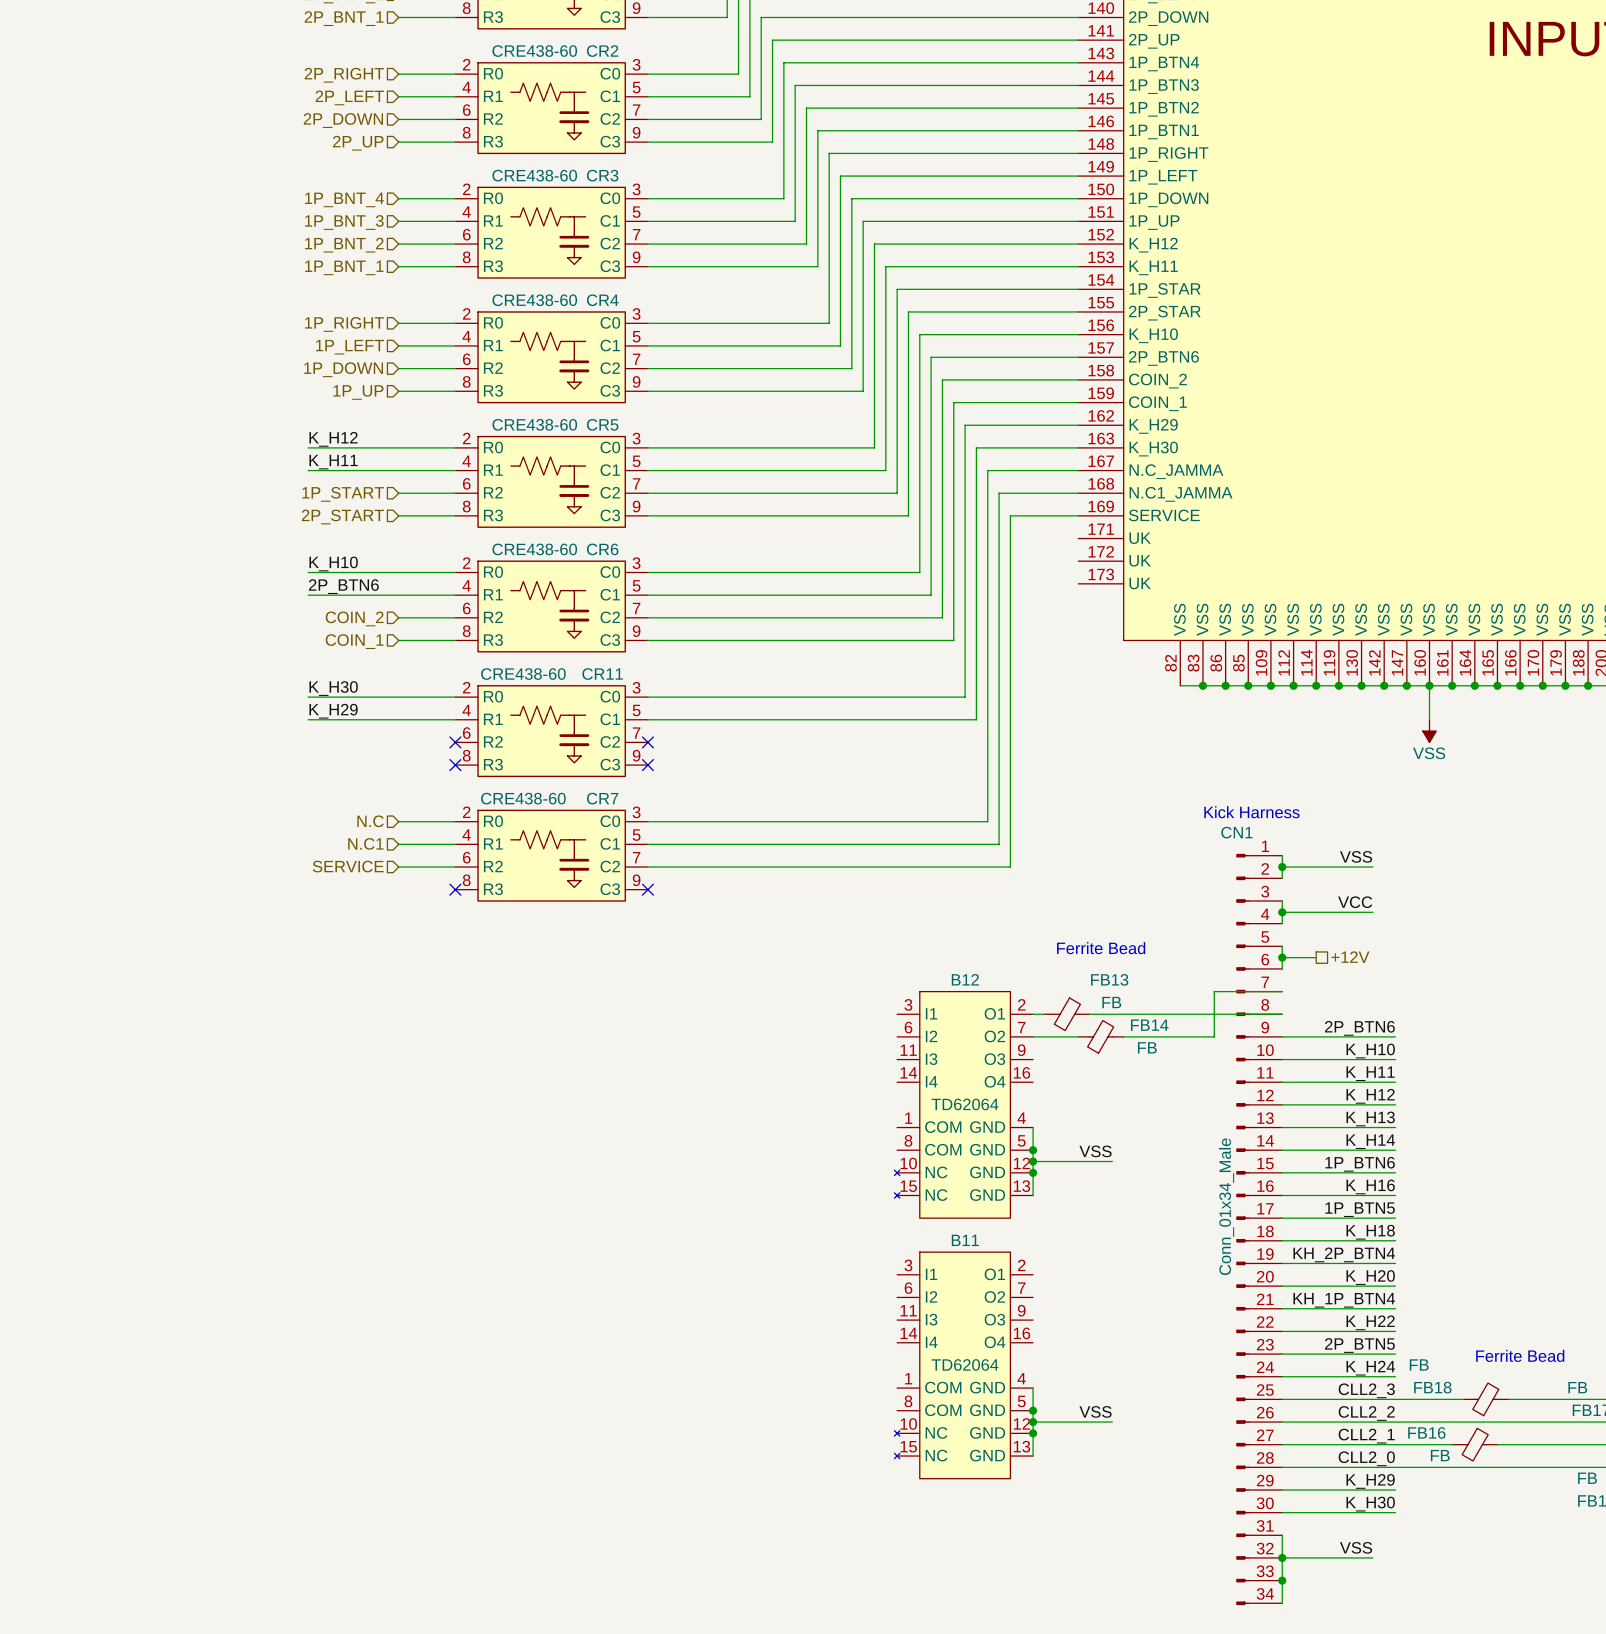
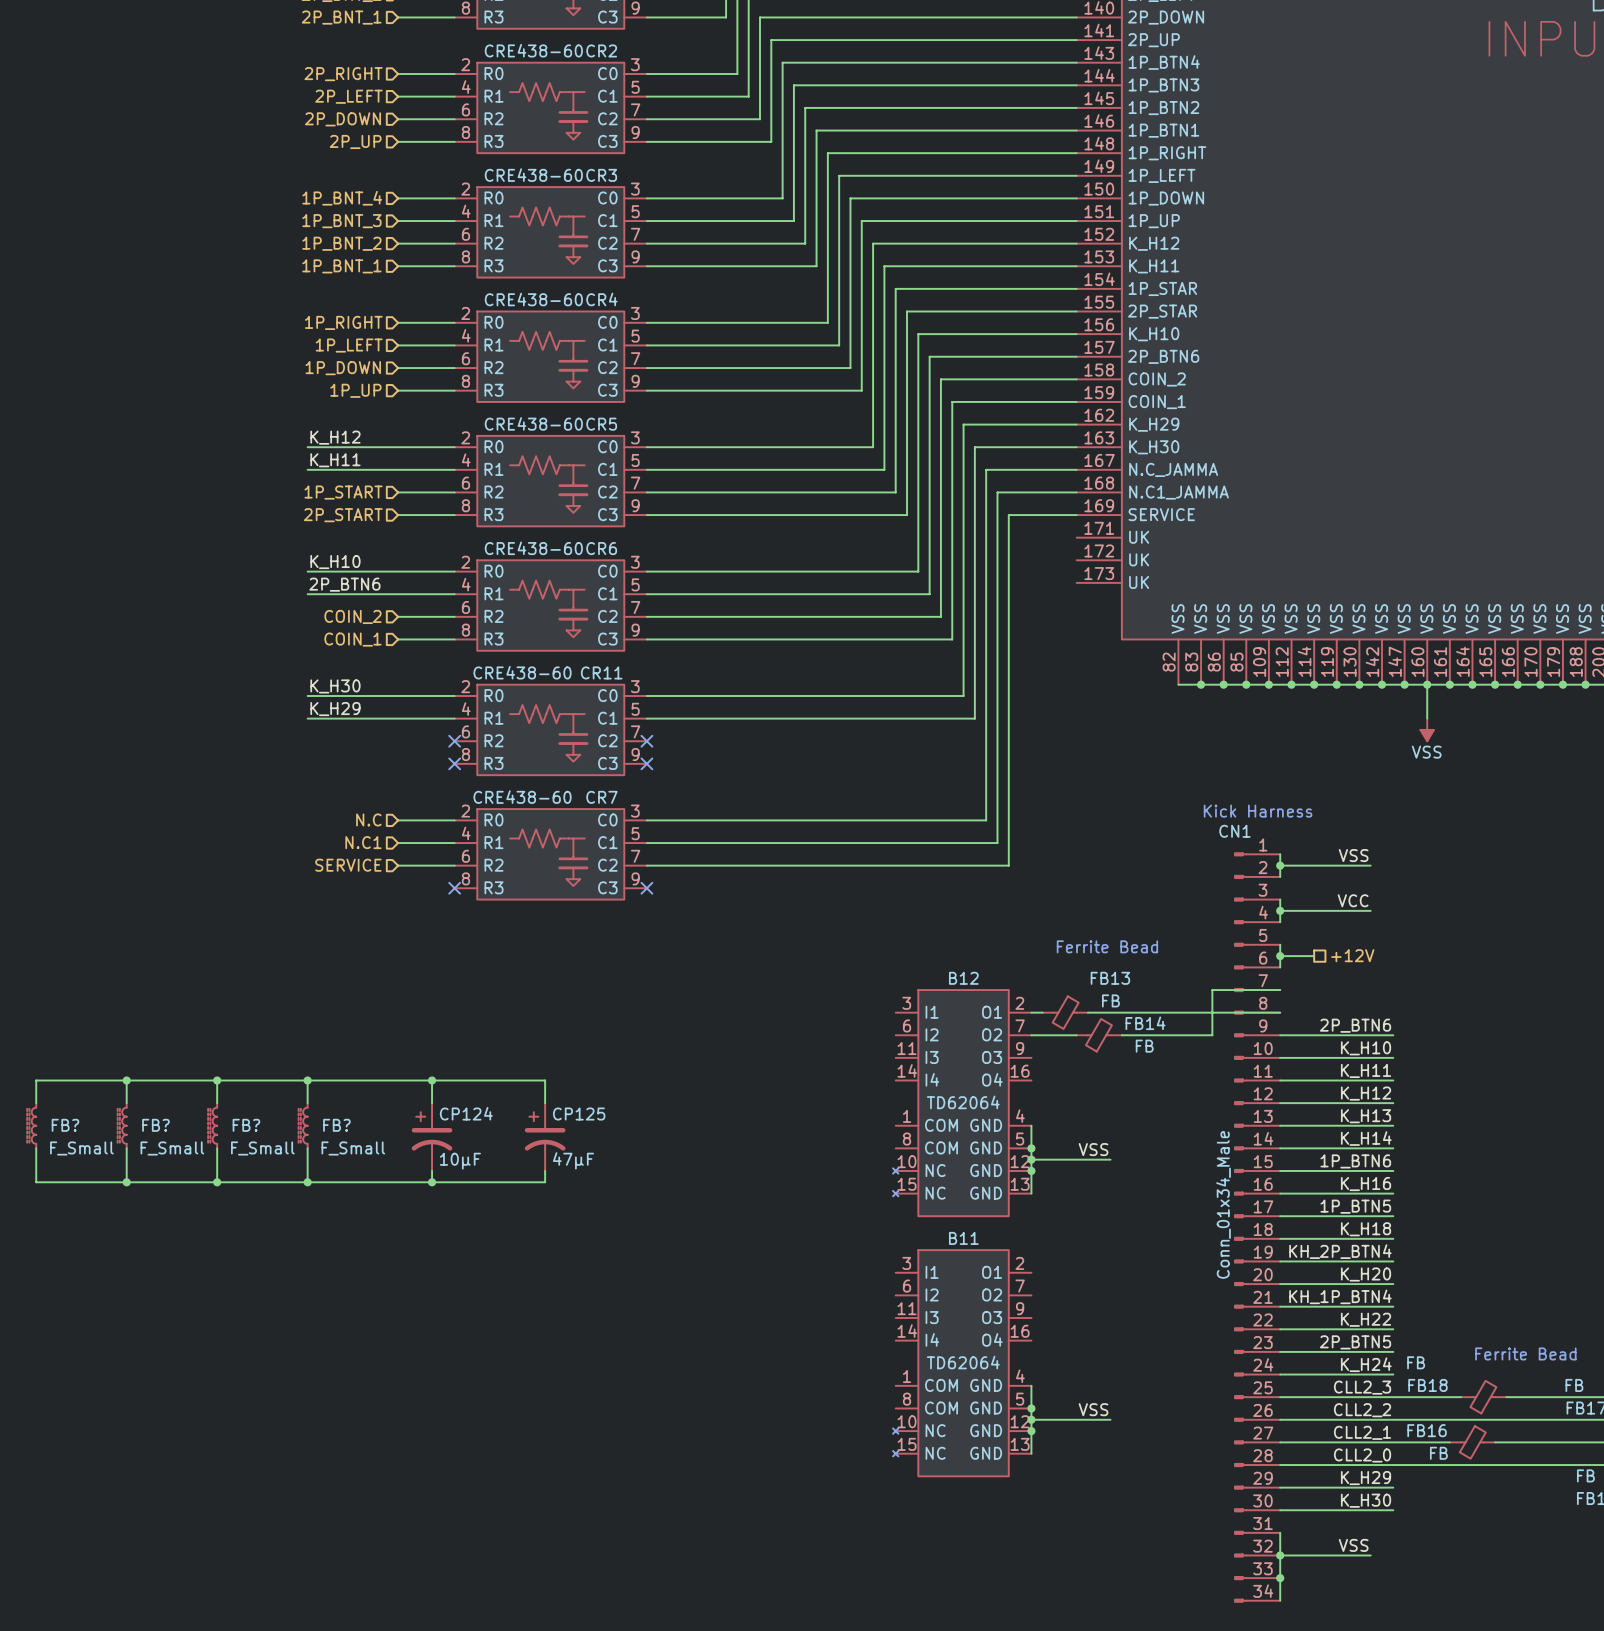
wire: none -> (126, 1080) (126, 1103)
junction: none -> (126, 1080)
wire: none -> (217, 1080) (217, 1103)
junction: none -> (217, 1080)
wire: none -> (307, 1080) (307, 1103)
junction: none -> (307, 1080)
wire: none -> (432, 1080) (432, 1103)
junction: none -> (432, 1080)
wire: none -> (36, 1103) (36, 1080) (545, 1080) (545, 1103)
FB?: none -> F_Small (31, 1125)
FB?: none -> F_Small (122, 1125)
FB?: none -> F_Small (212, 1125)
FB?: none -> F_Small (303, 1125)
CP124: none -> 10μF (432, 1137)
CP125: none -> 47μF (545, 1137)
wire: none -> (36, 1148) (36, 1182) (545, 1182) (545, 1170)
wire: none -> (126, 1148) (126, 1182)
wire: none -> (217, 1148) (217, 1182)
wire: none -> (307, 1148) (307, 1182)
wire: none -> (432, 1170) (432, 1182)
junction: none -> (126, 1182)
junction: none -> (217, 1182)
junction: none -> (307, 1182)
junction: none -> (432, 1182)

